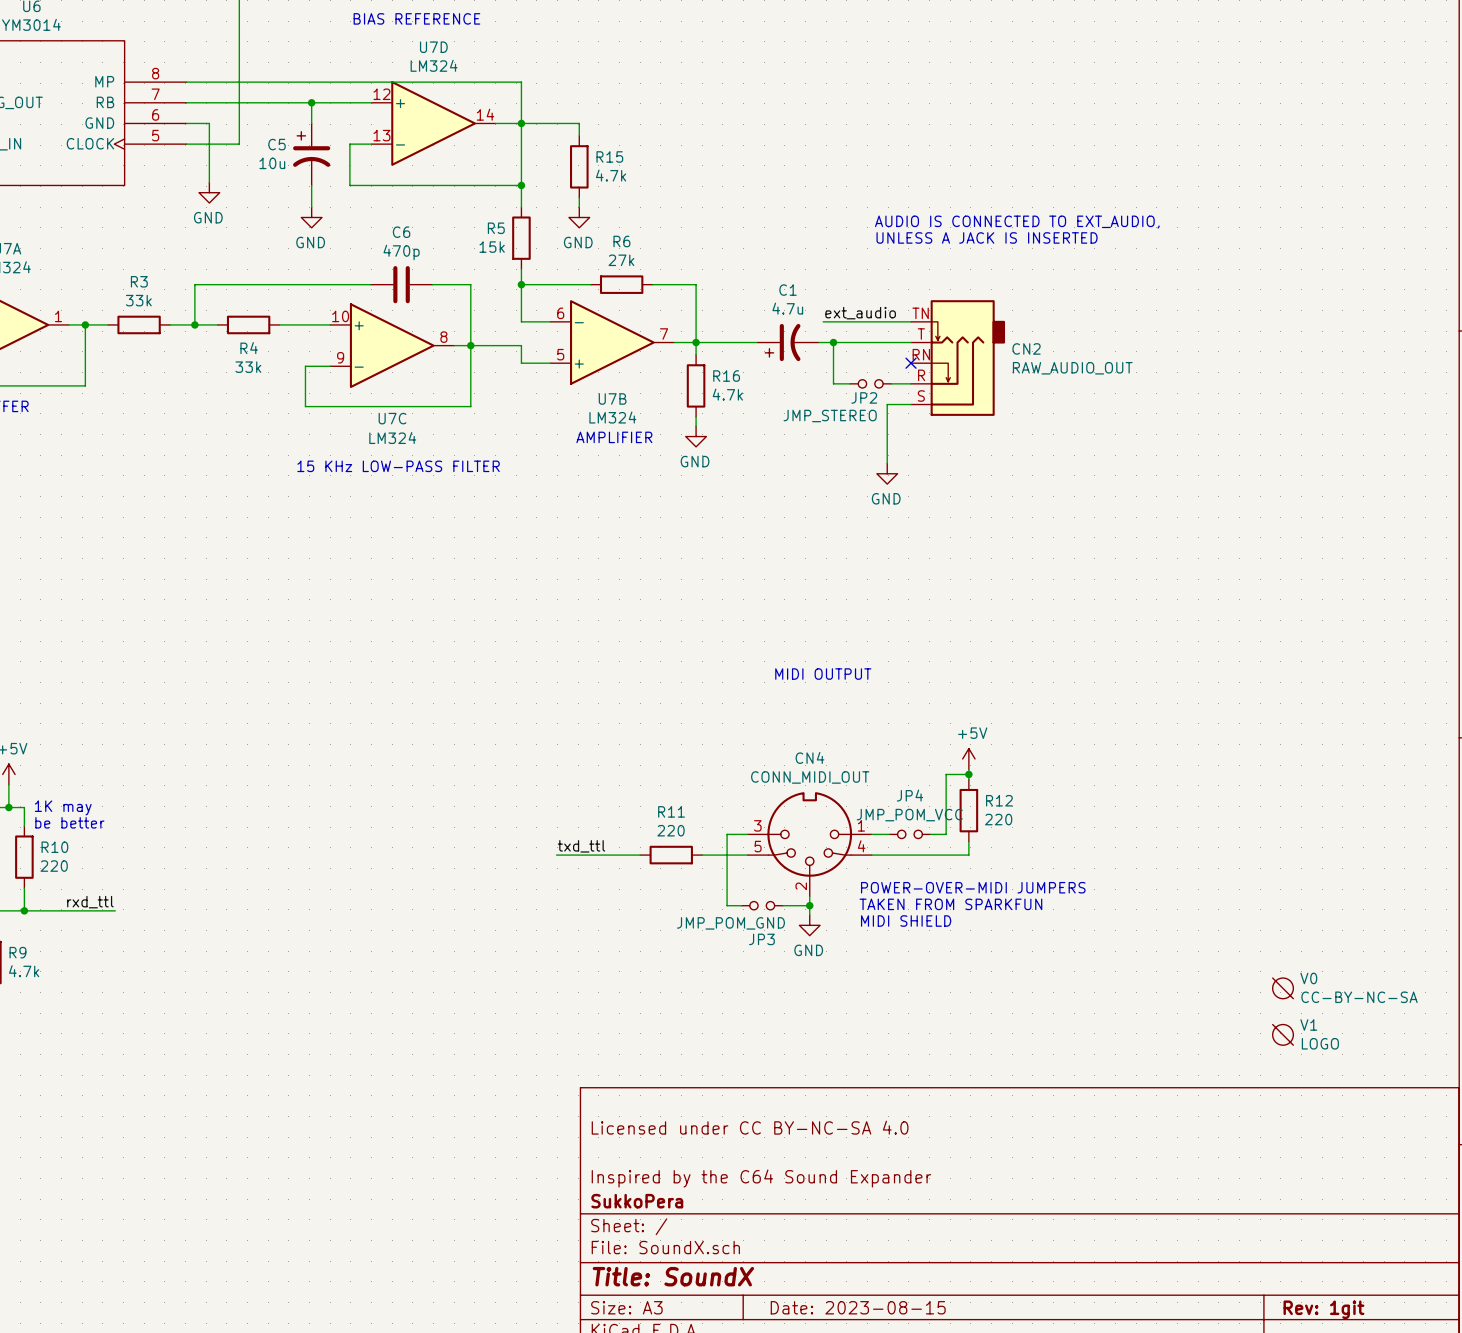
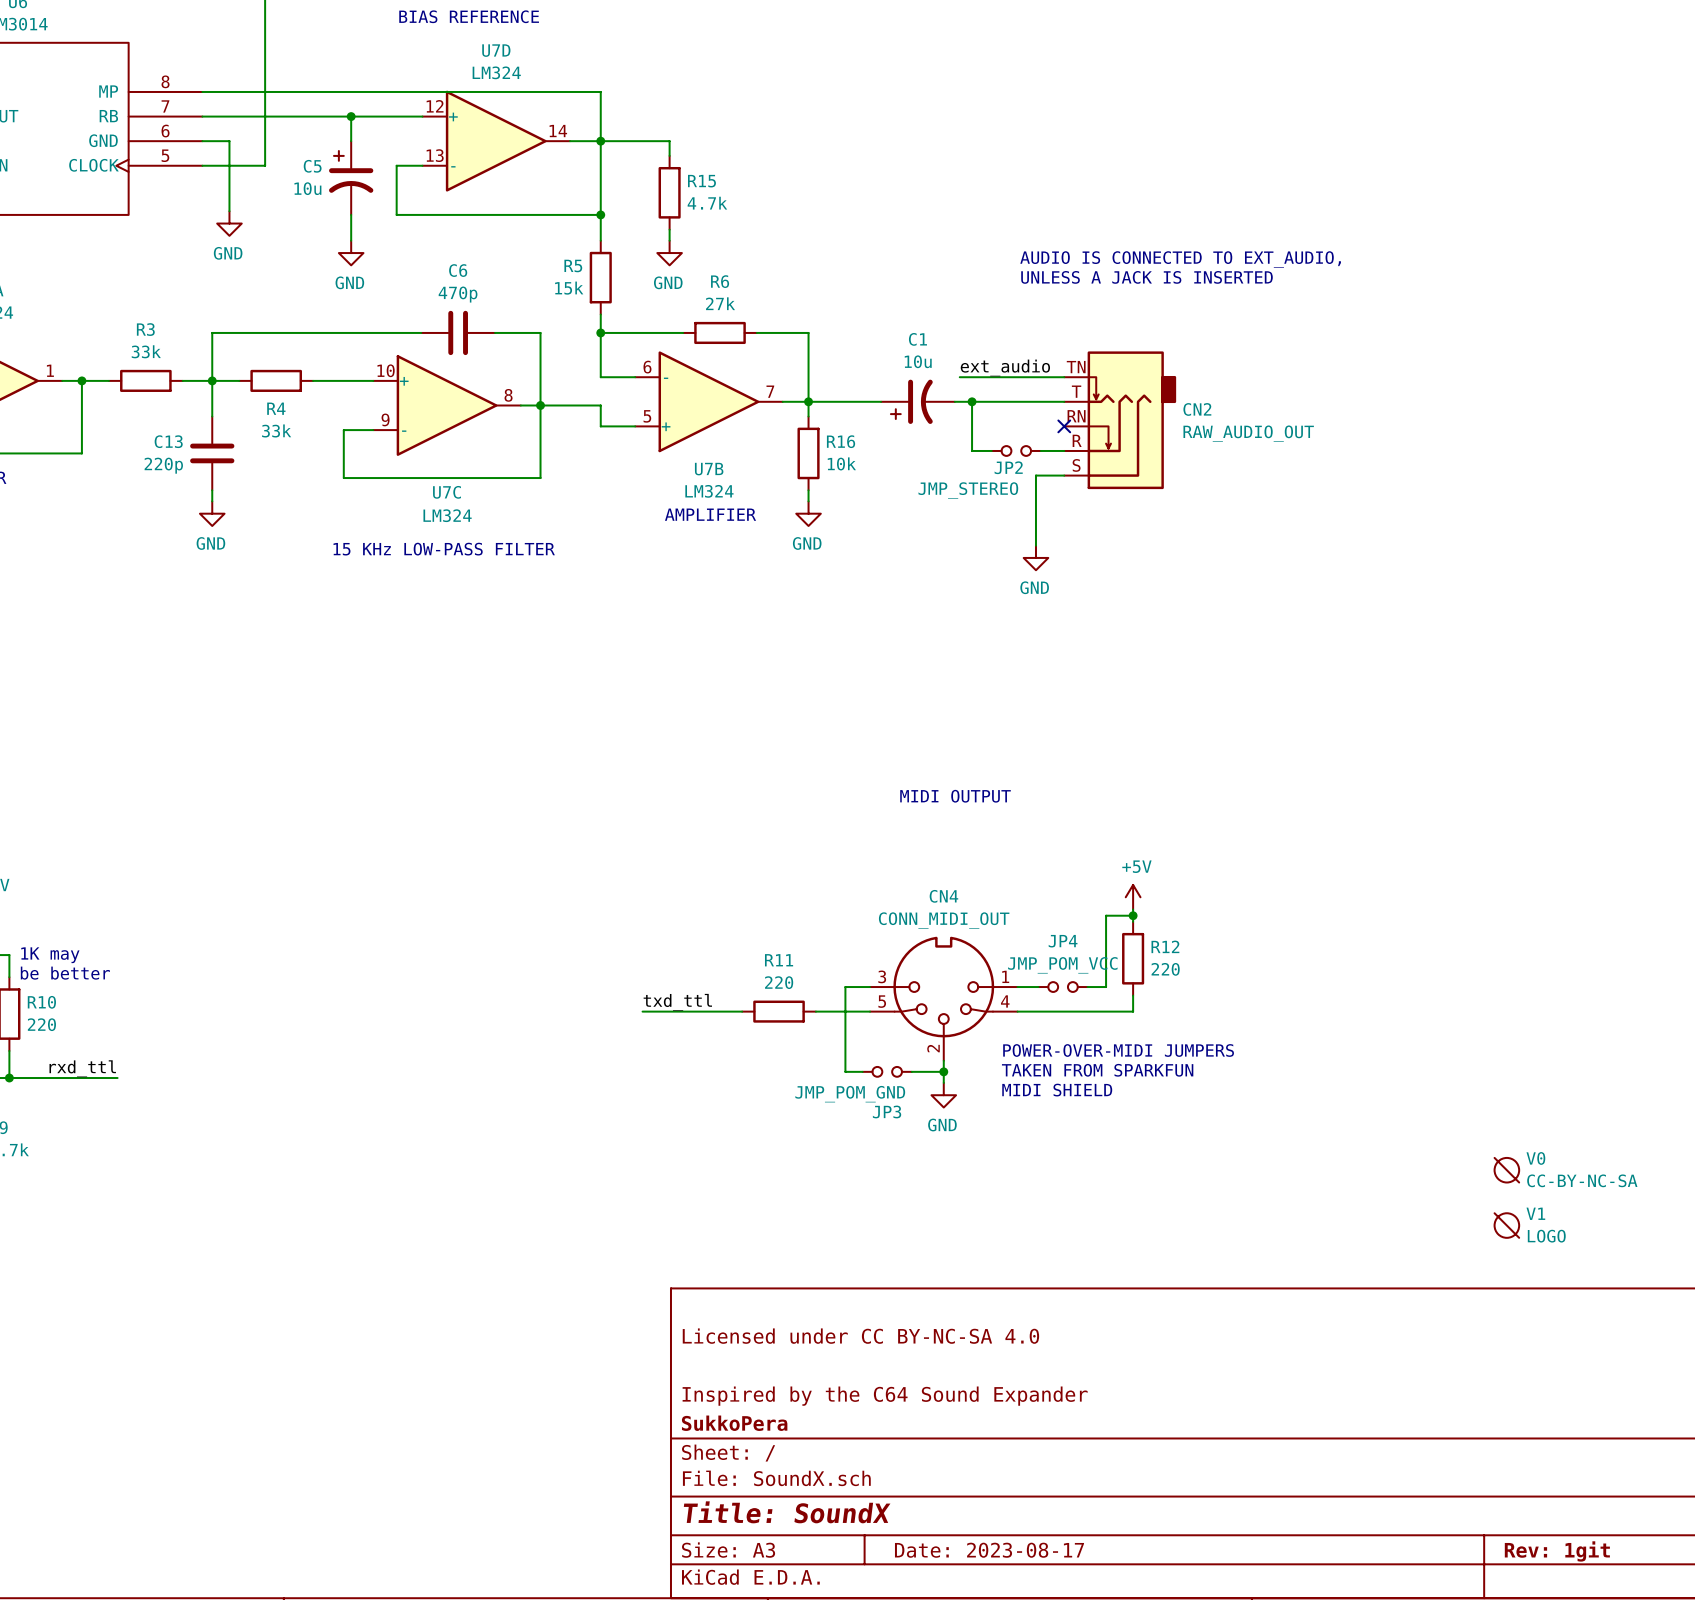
C1 value: 4.7u (787, 308) -> 10u (918, 361)
wire: none -> (212, 380) (212, 416)
C13: none -> 220p (212, 453)
R16 value: 4.7k (727, 394) -> 10k (841, 463)
wire: none -> (212, 490) (212, 501)
power symbol: none -> GND (212, 513)
title block: Date: 2023-08-15 (858, 1307) -> Date: 2023-08-17 (989, 1550)

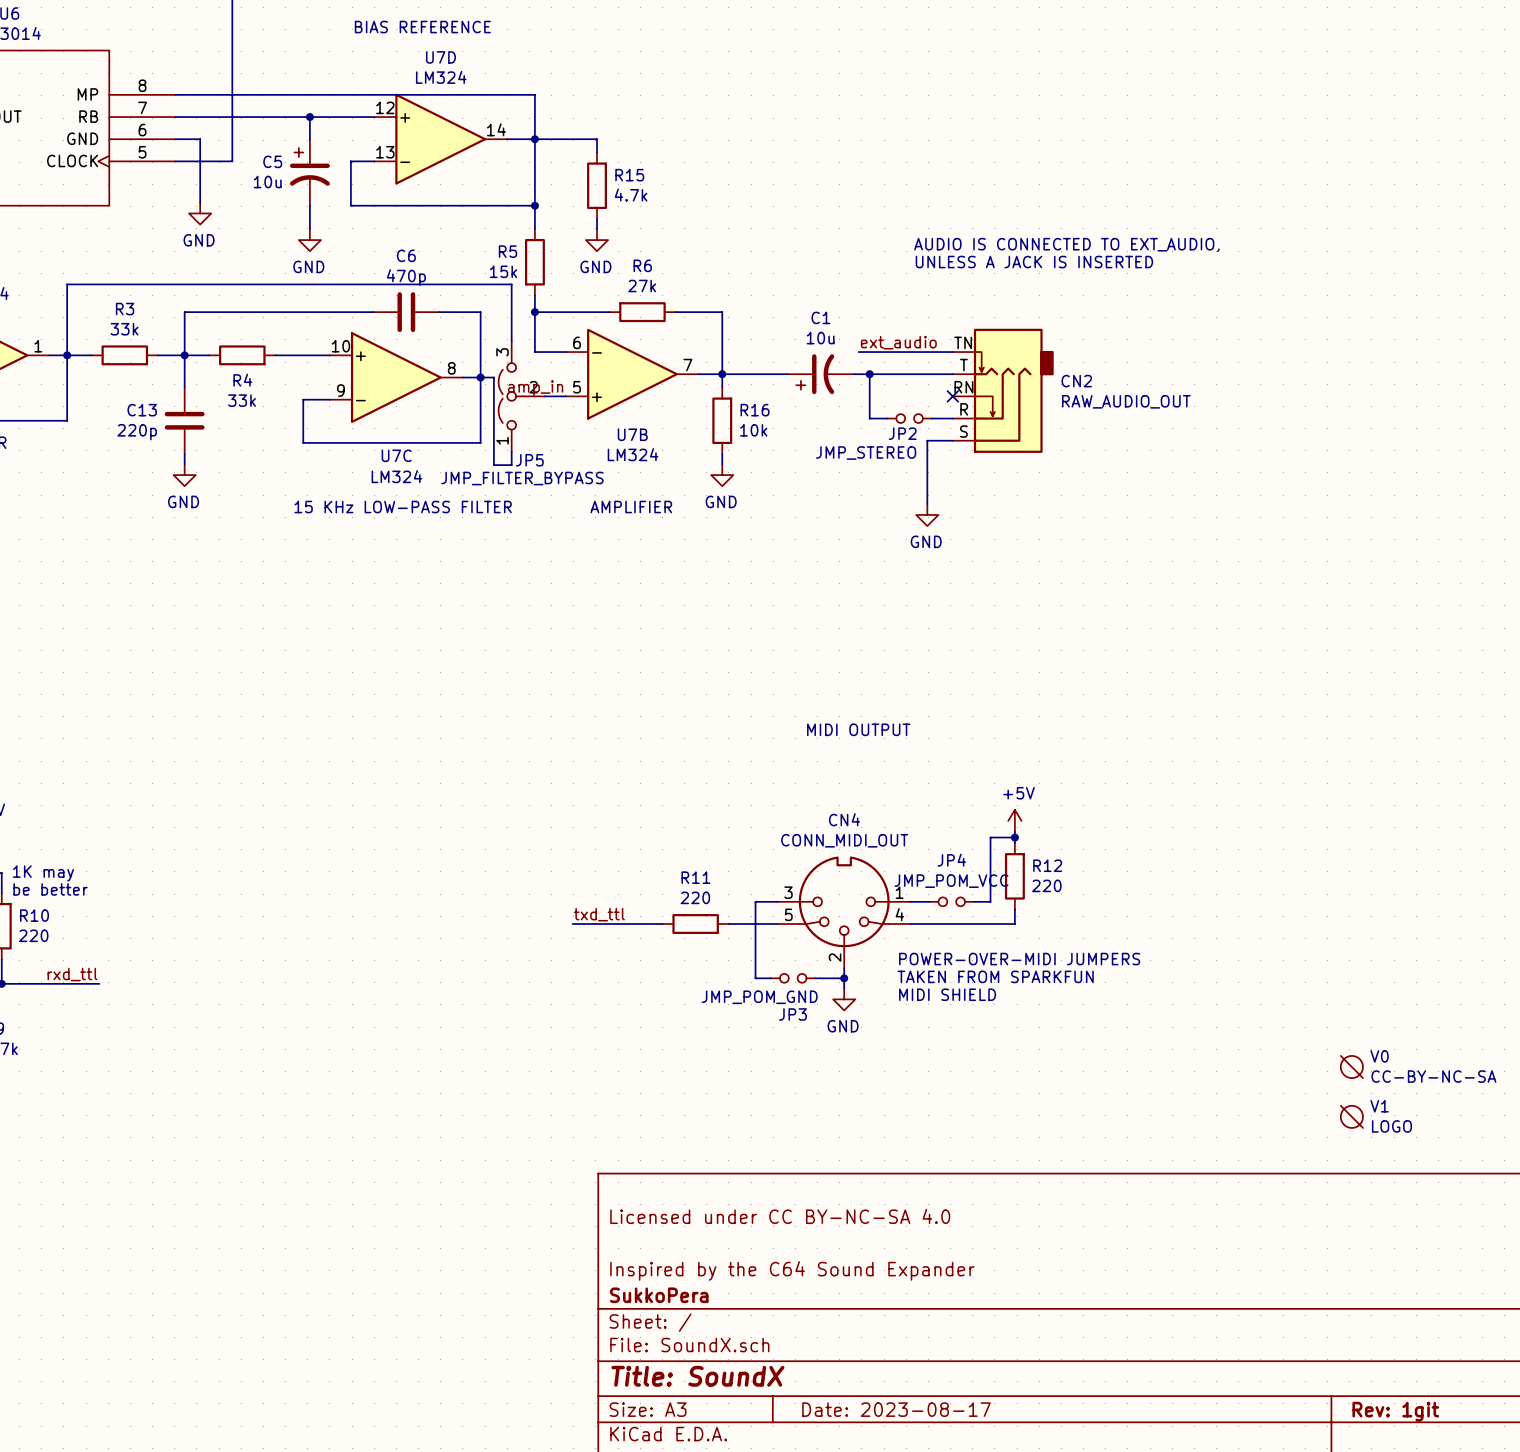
wire: none -> (511, 340) (511, 284) (67, 284) (67, 355)
wire: (555, 405) (600, 405) (600, 426) (611, 426) -> (493, 377) (493, 465) (511, 465) (511, 451)
label: none -> amp_in (535, 388)
JP5: none -> JMP_FILTER_BYPASS (521, 396)
text position: AMPLIFIER (710, 514) -> AMPLIFIER (631, 507)

